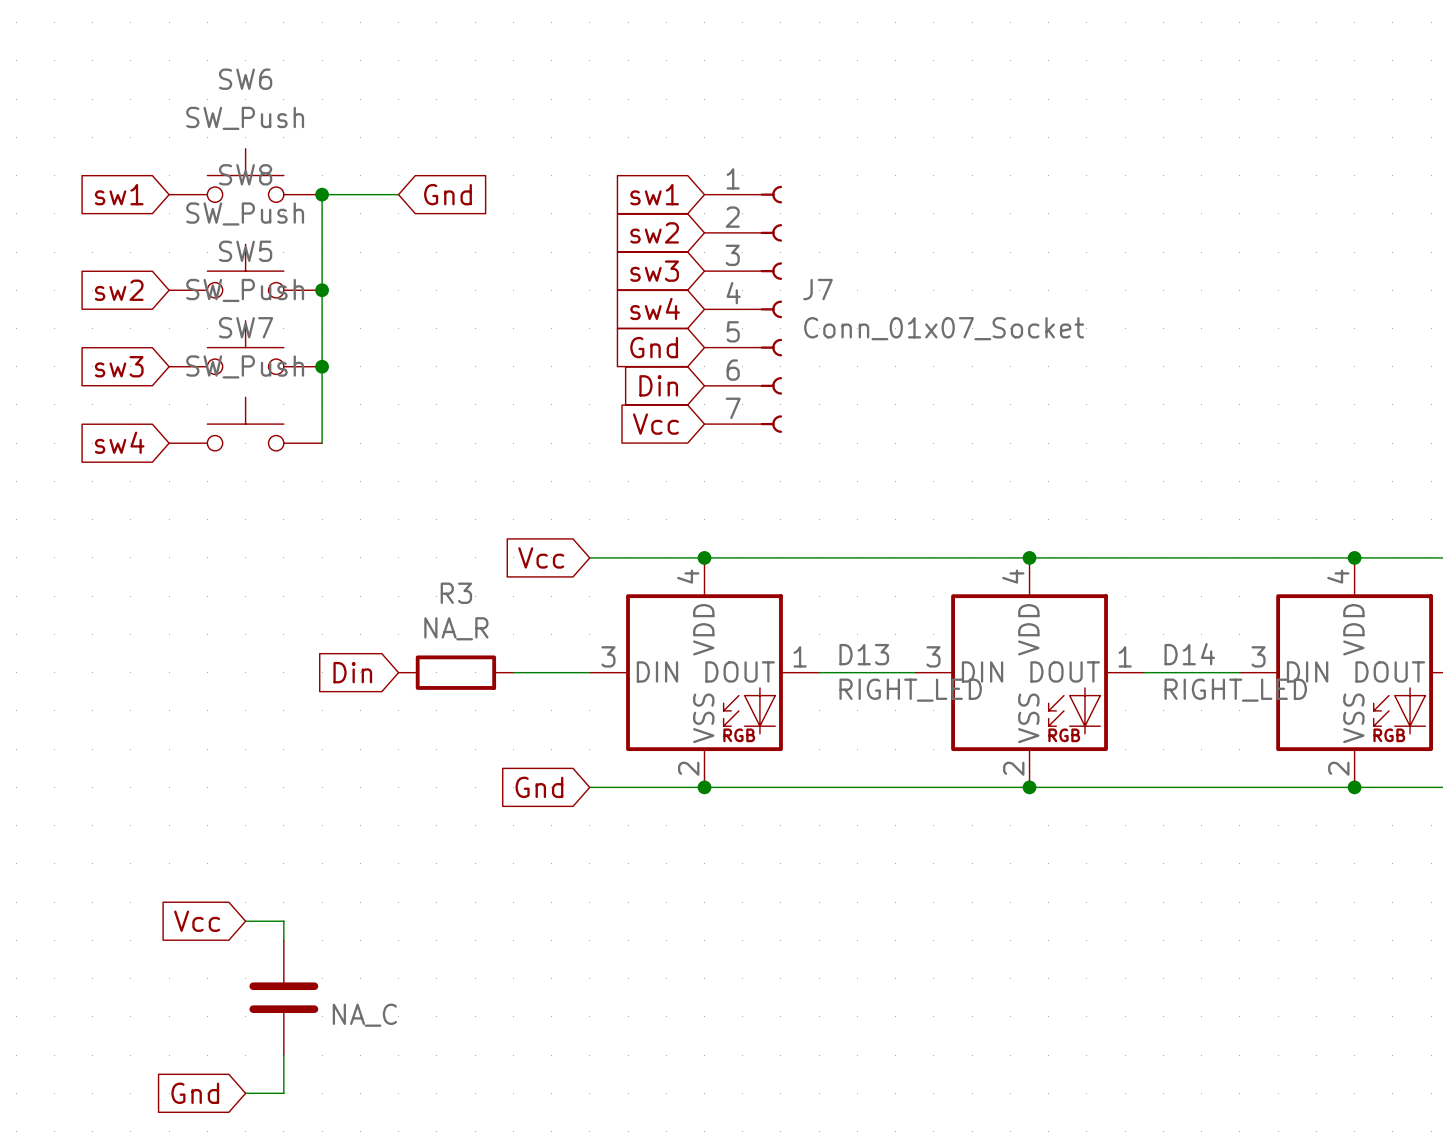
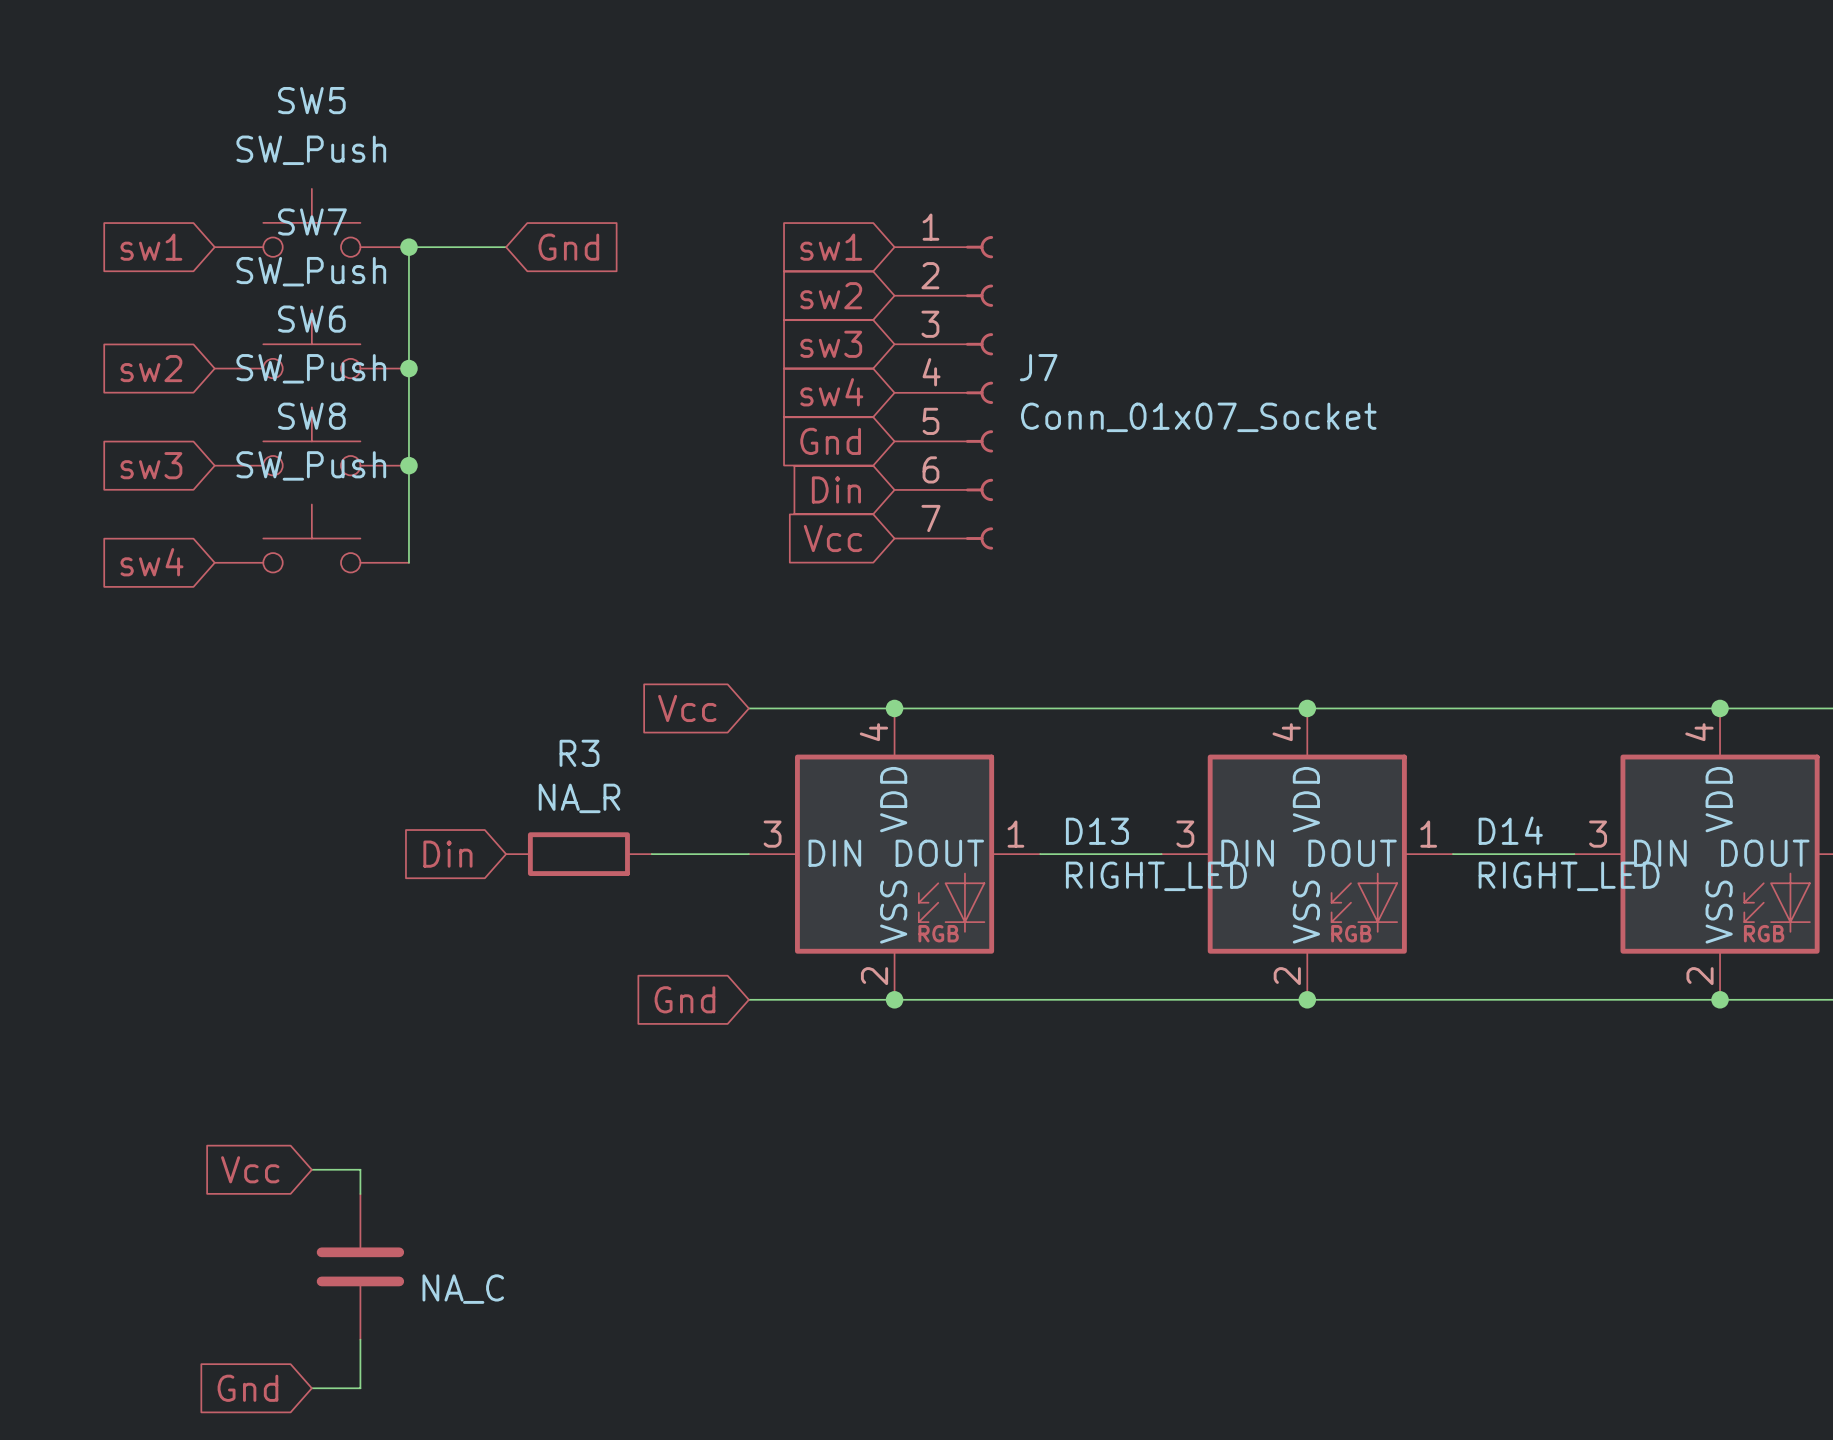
SW6 name: SW6 (245, 79) -> SW5 (311, 100)
SW8 name: SW8 (245, 174) -> SW7 (312, 221)
SW5 name: SW5 (245, 251) -> SW6 (311, 319)
SW7 name: SW7 (246, 327) -> SW8 (311, 416)

